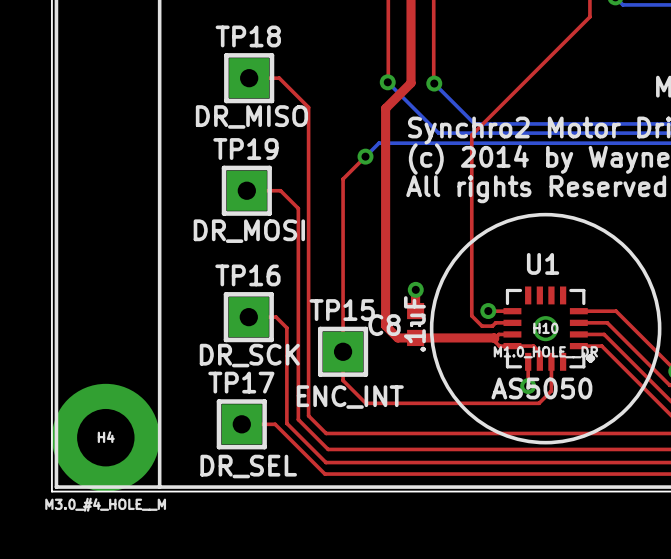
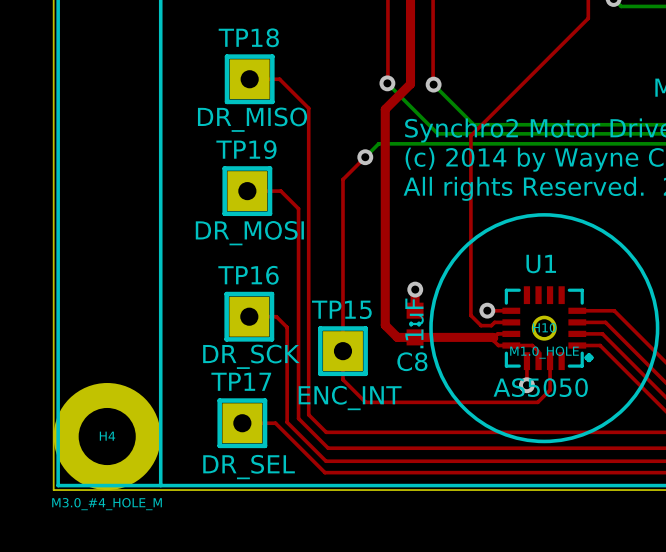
C8 name position: C8 (384, 325) -> C8 (412, 361)
H10 value: M1.0_HOLE__DR (545, 352) -> M1.0_HOLE (544, 352)
H4 value: M3.0_#4_HOLE__M (105, 504) -> M3.0_#4_HOLE_M (107, 504)

